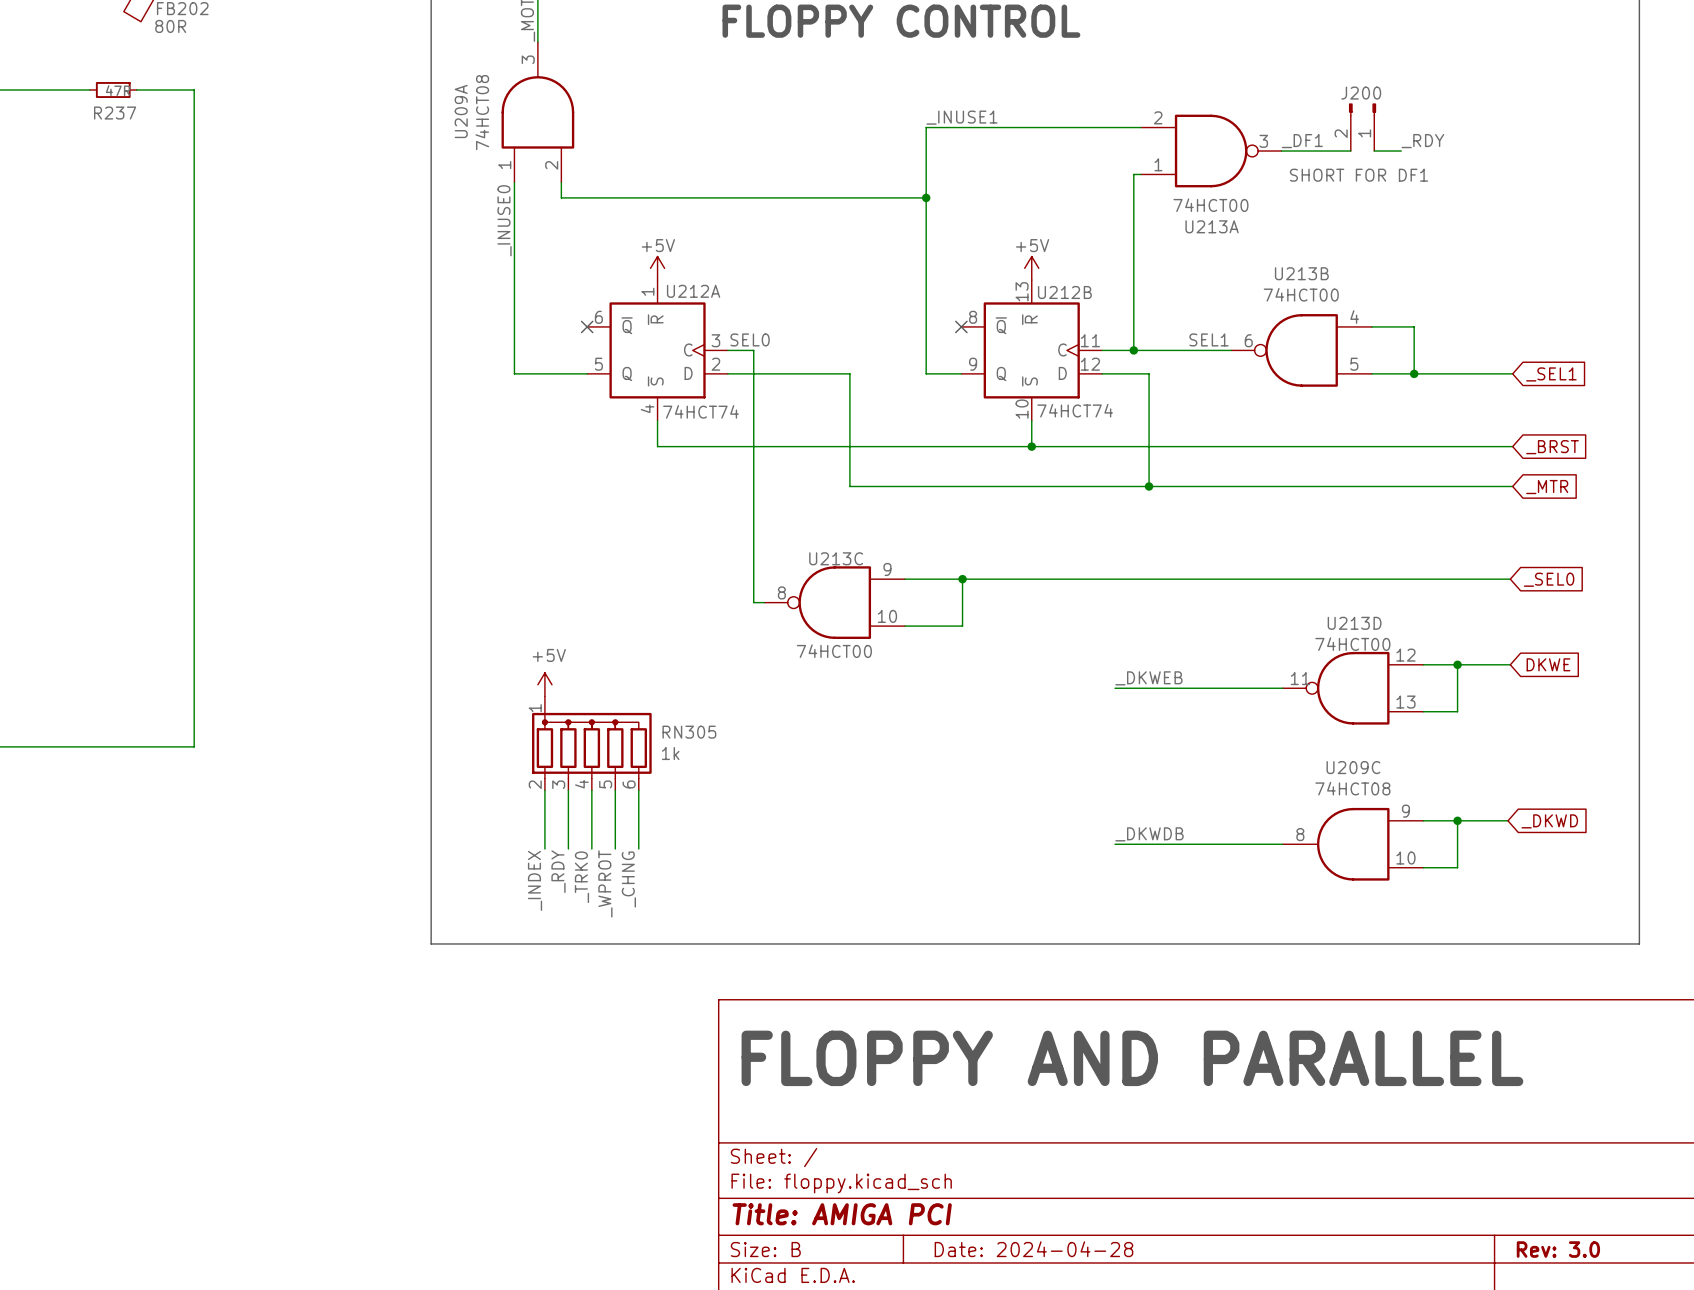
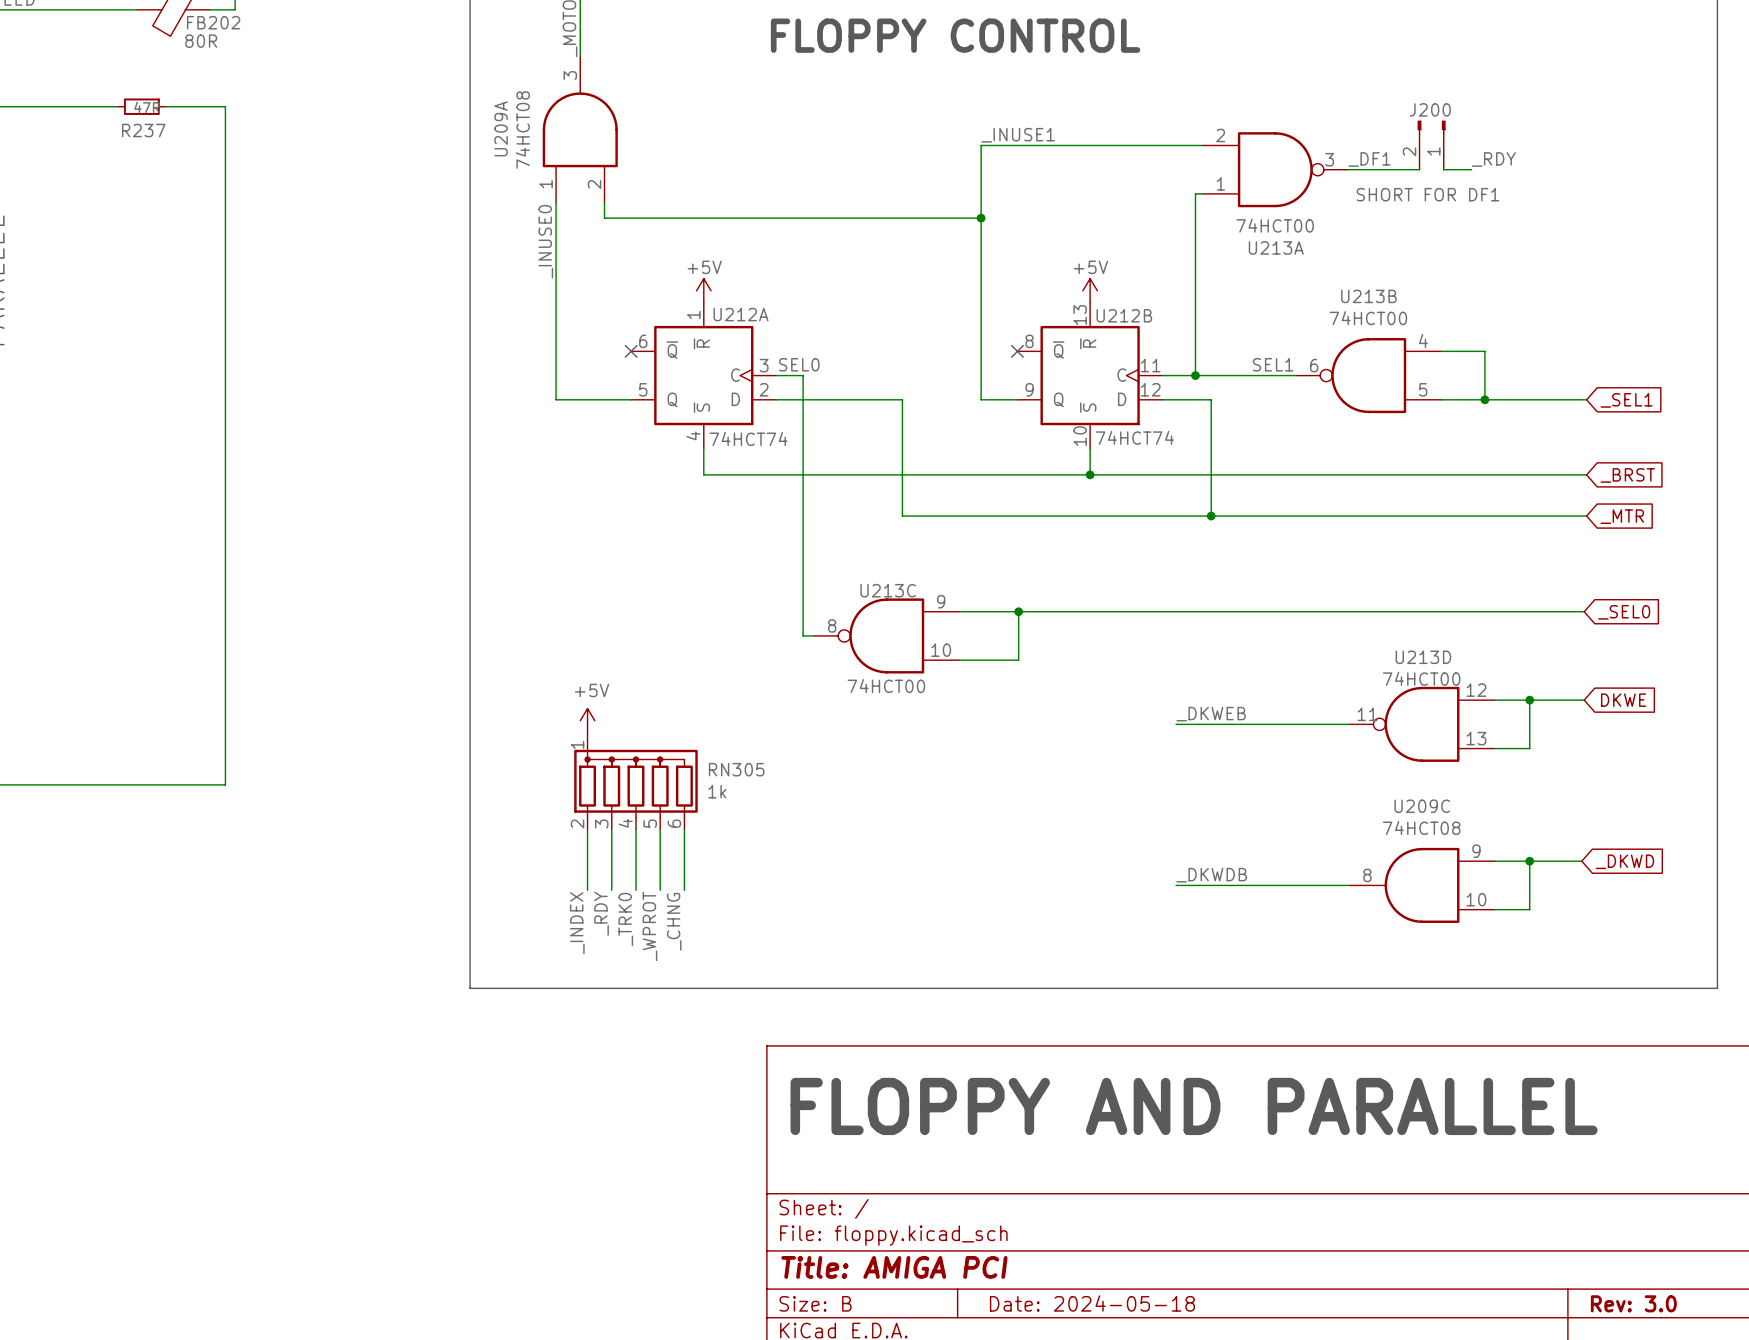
title block: Date: 2024-04-28 (1033, 1249) -> Date: 2024-05-18 (1092, 1303)

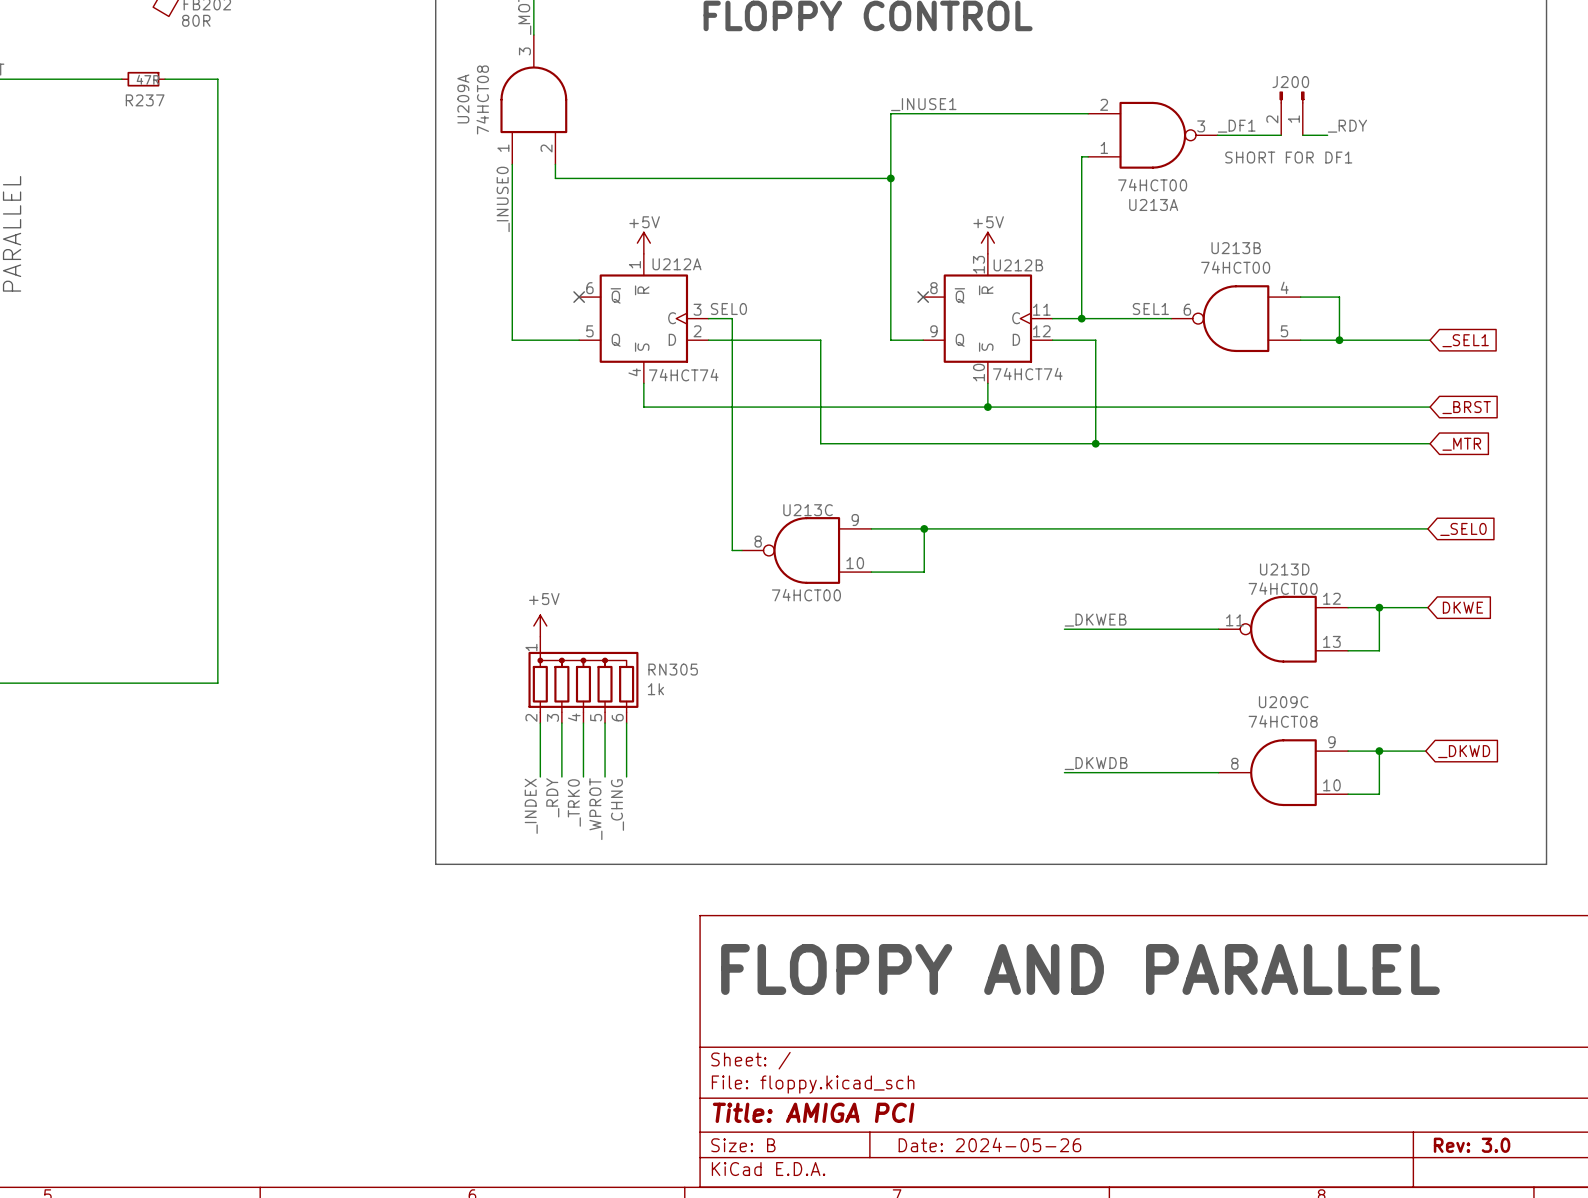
title block: Date: 2024-05-18 (1092, 1303) -> Date: 2024-05-26 (989, 1144)

